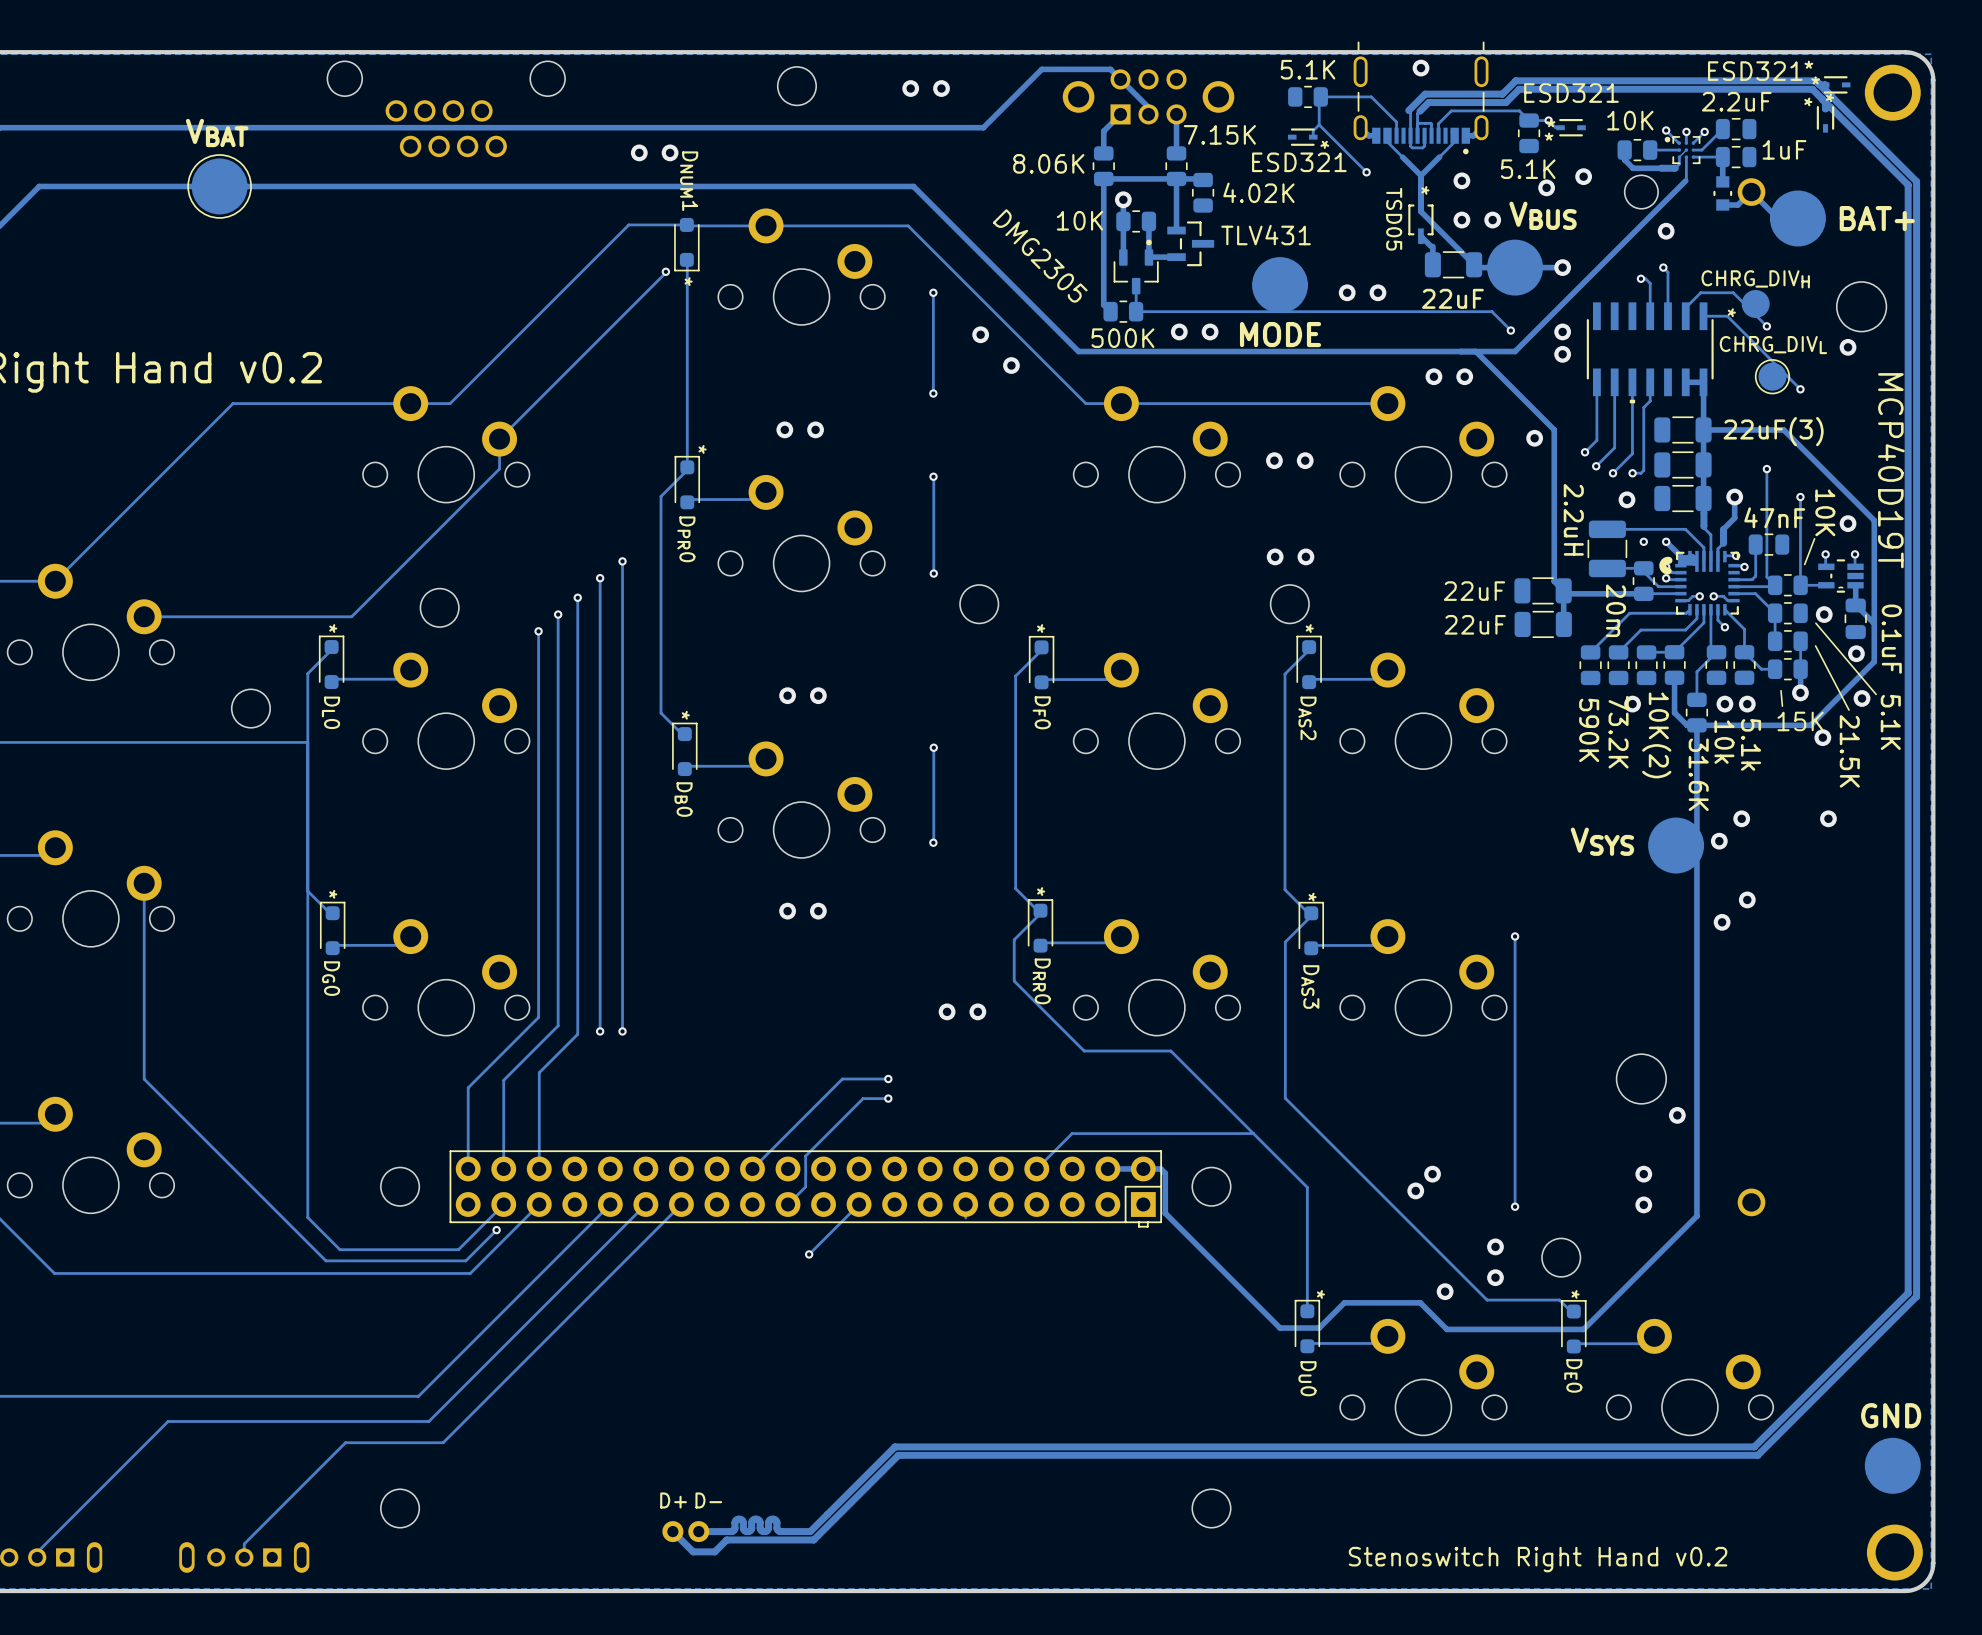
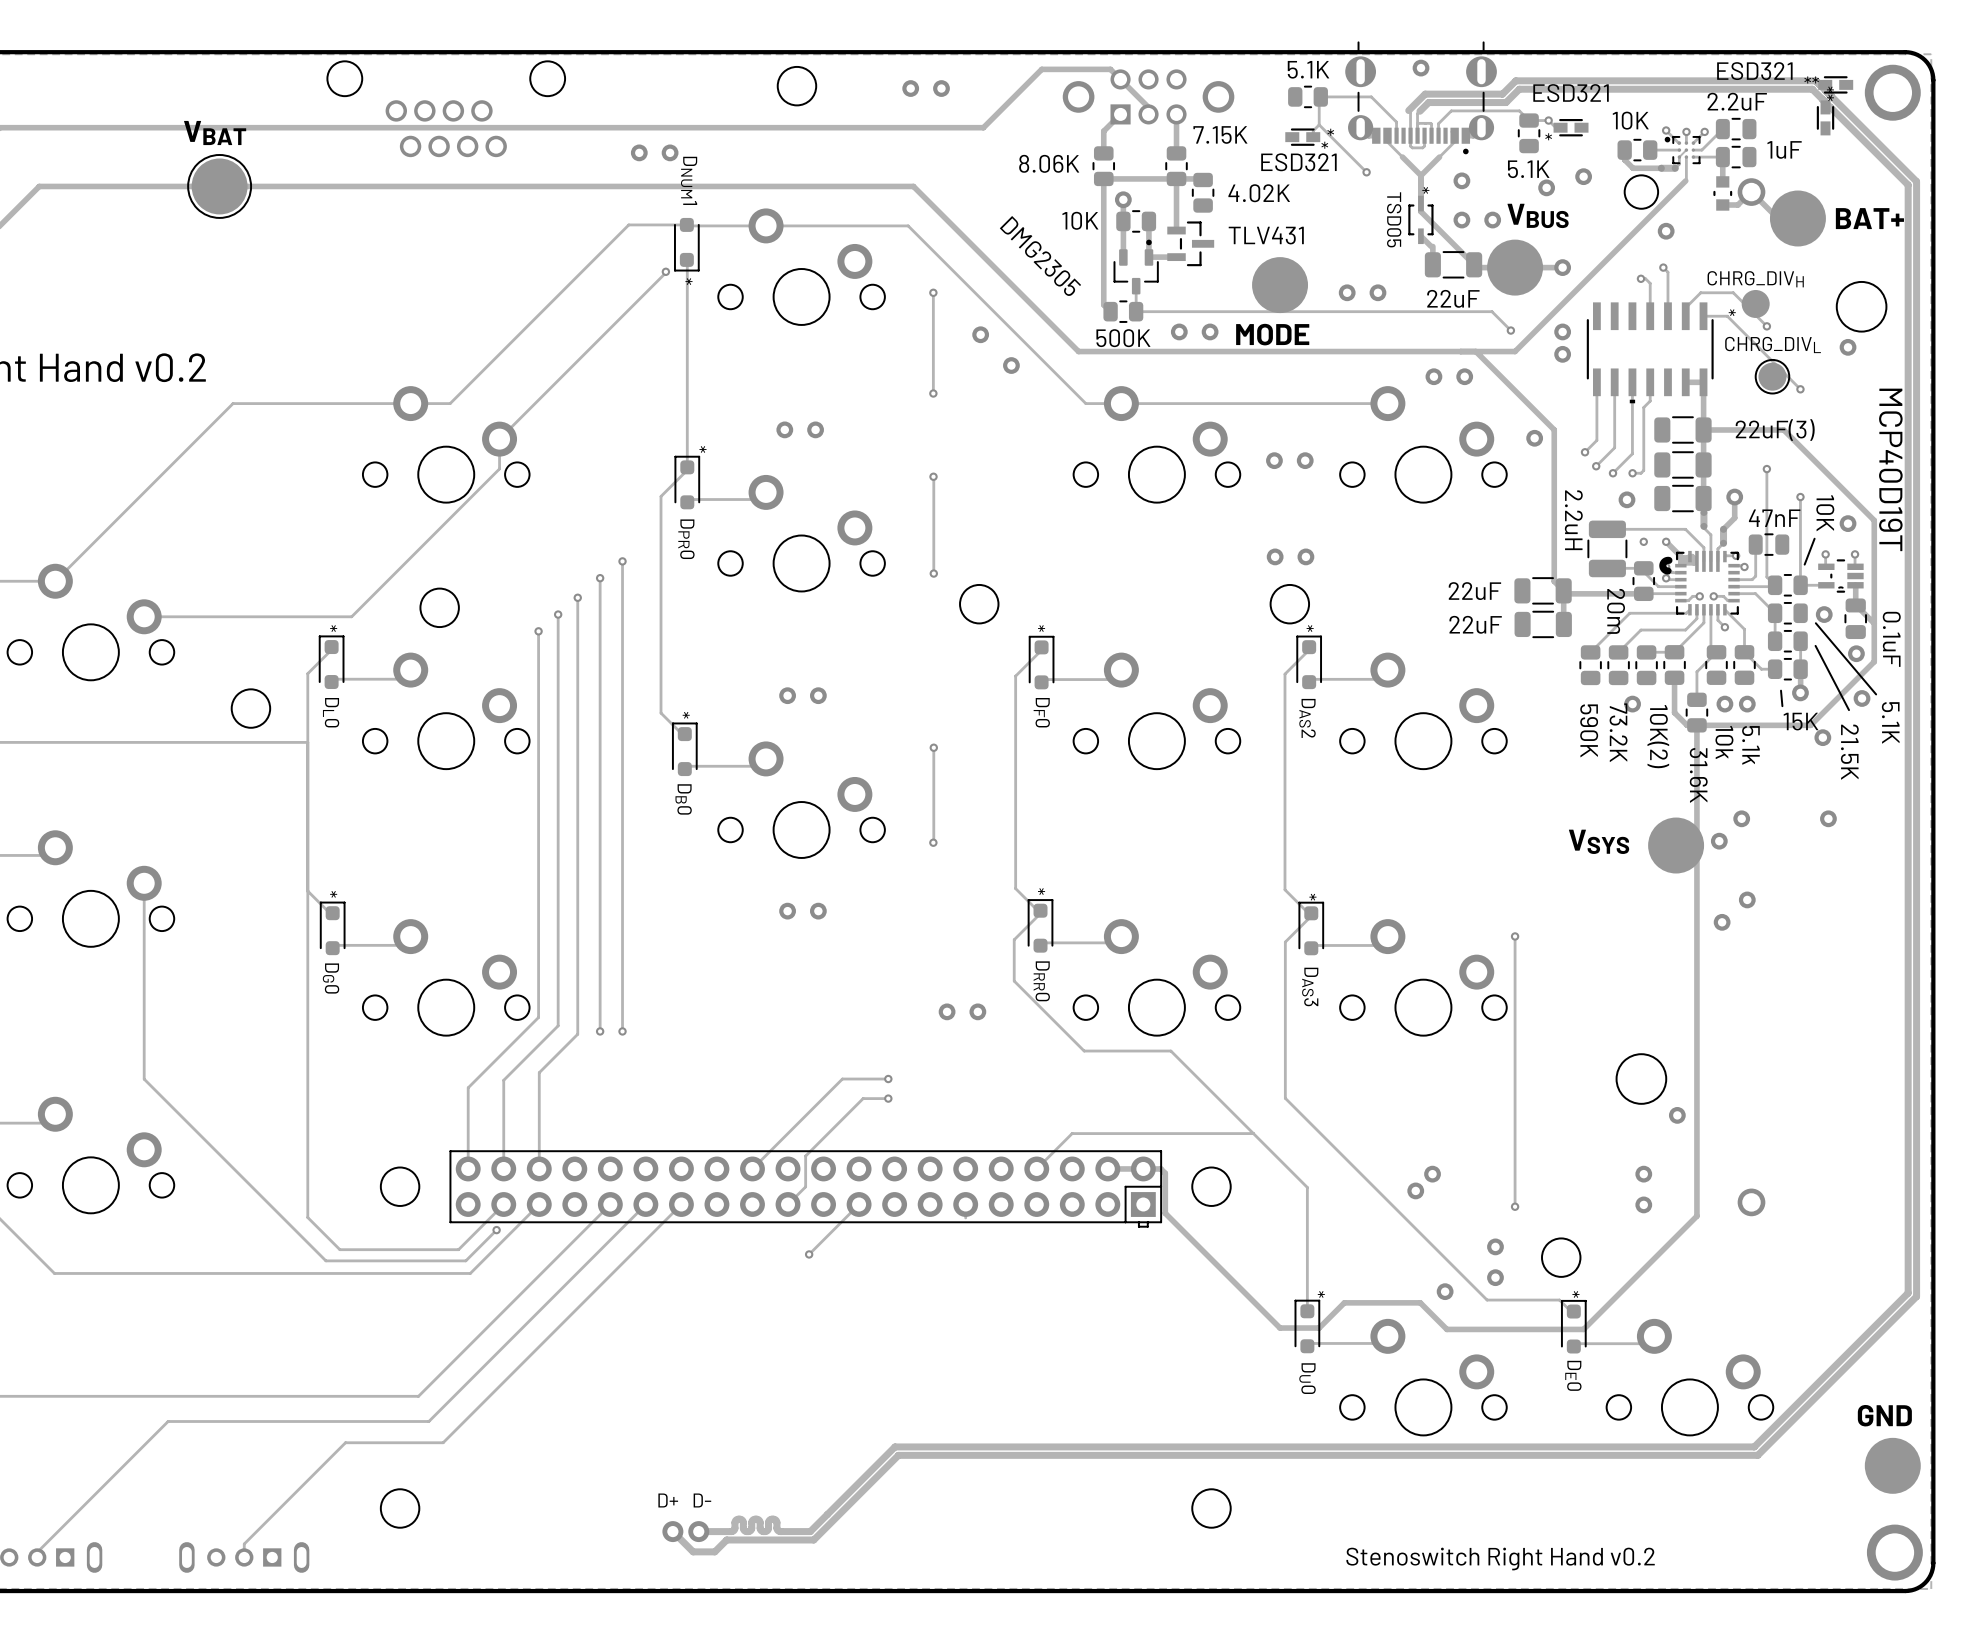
part footprint: [1353, 41, 1489, 155] -> [1345, 41, 1497, 155]
part footprint: [1820, 76, 1851, 94] -> [1818, 76, 1854, 94]
part footprint: [1816, 103, 1835, 133] -> [1816, 100, 1835, 136]
part footprint: [1556, 118, 1586, 137] -> [1553, 118, 1589, 137]
part footprint: [1288, 128, 1318, 146] -> [1285, 128, 1321, 146]

